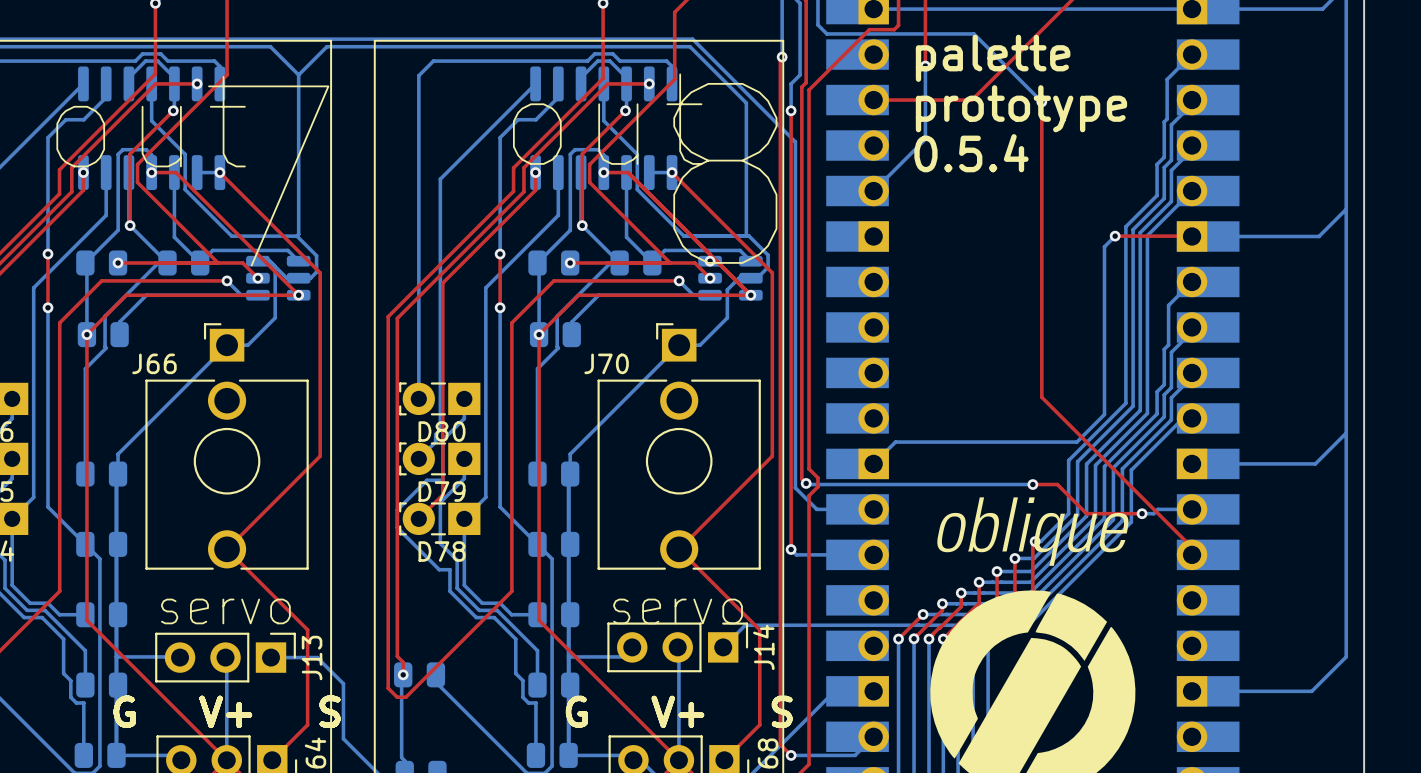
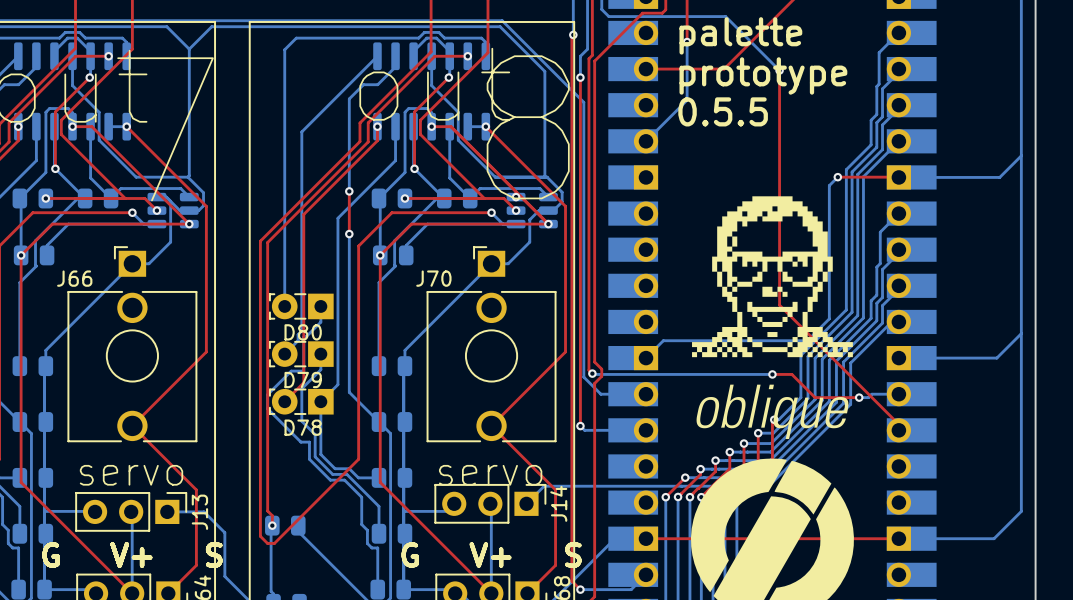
text: 0.5.4 (971, 153) -> 0.5.5 (723, 111)
drawing: none -> [692, 196, 853, 358]
top track: none -> (646, 538) (898, 538)

